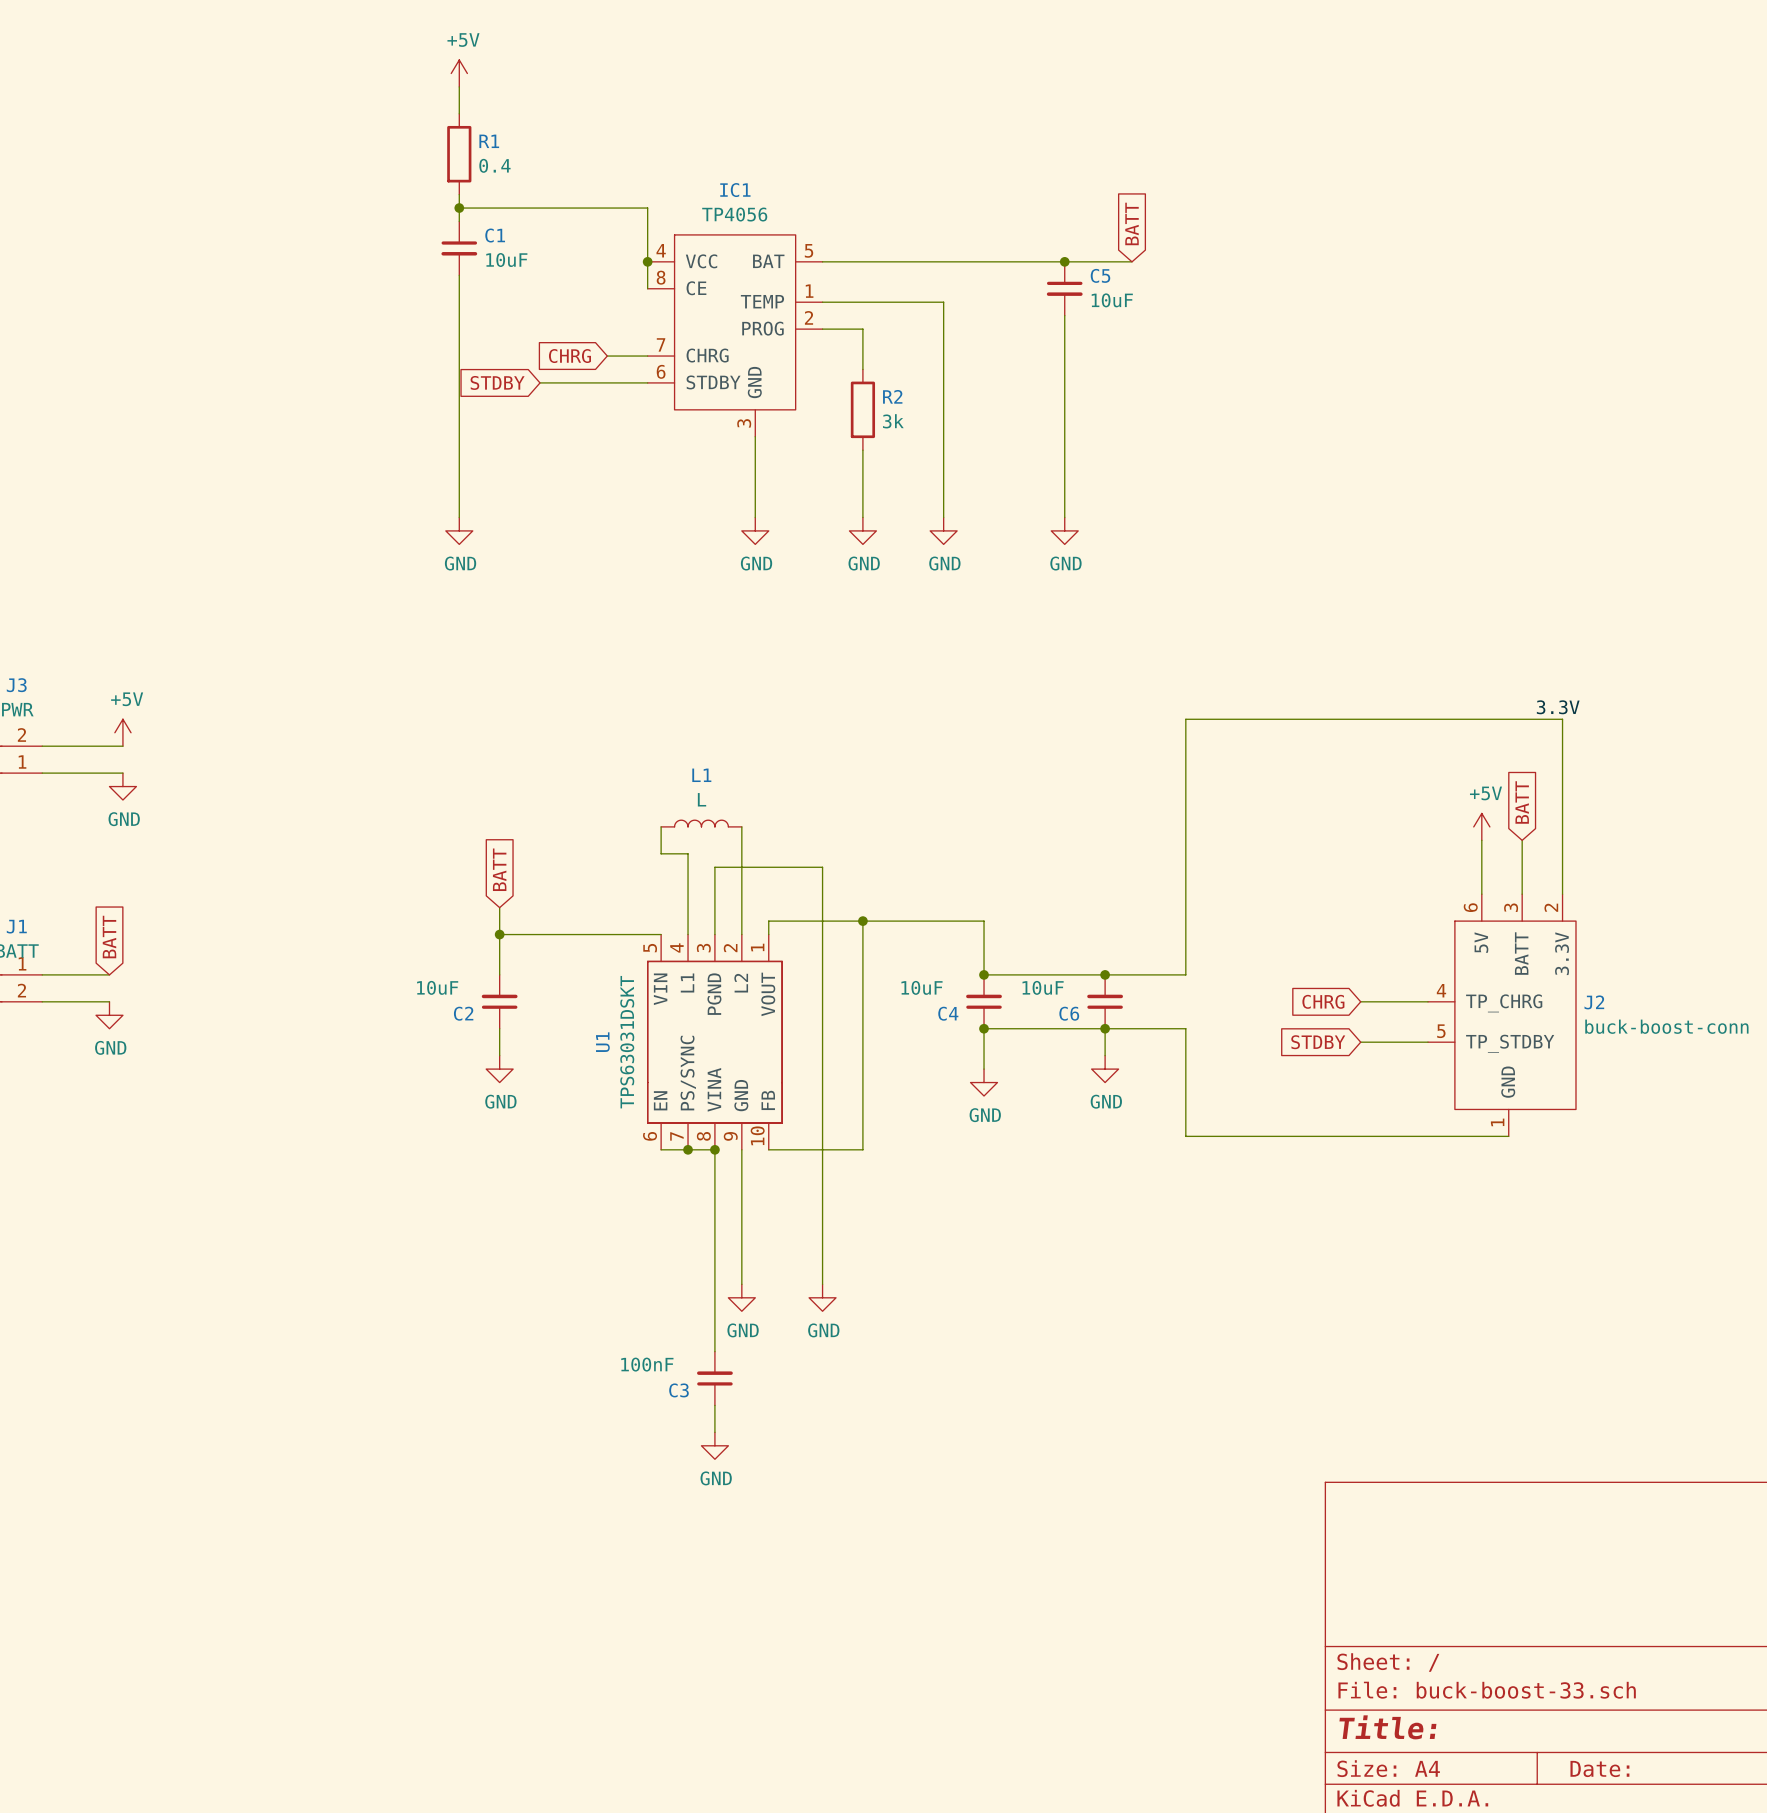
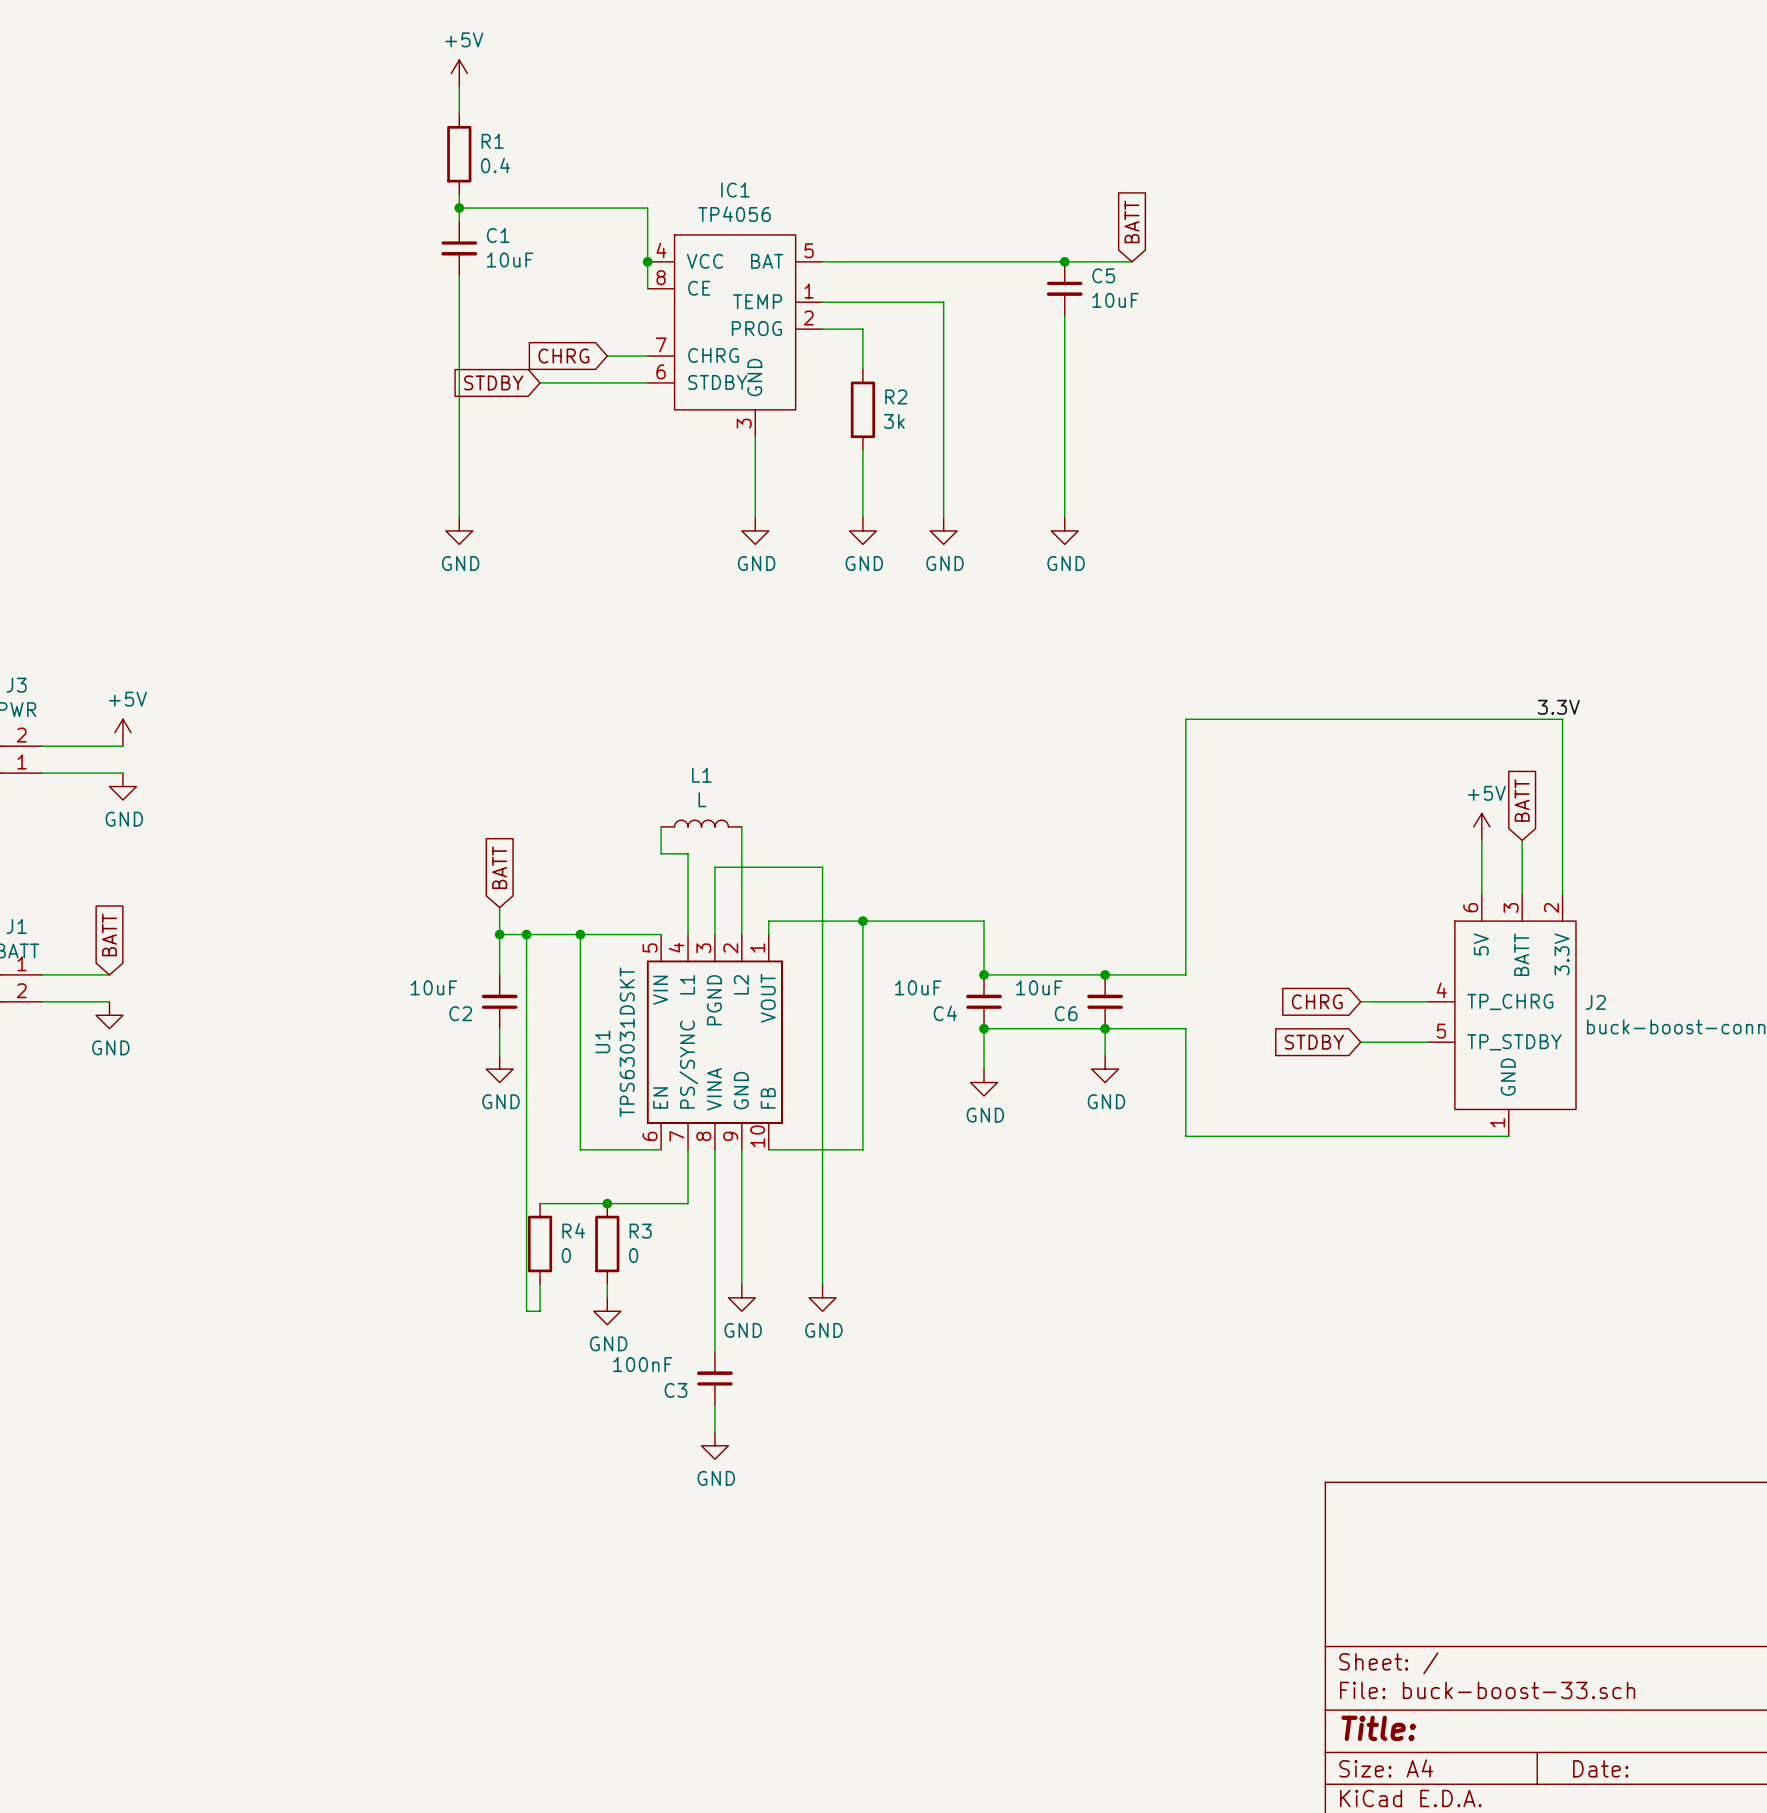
wire: none -> (526, 934) (526, 1311) (540, 1311) (540, 1284)
junction: none -> (526, 934)
junction: none -> (580, 934)
wire: (661, 1149) (714, 1149) -> (661, 1149) (580, 1149) (580, 934)
wire: none -> (688, 1149) (688, 1203) (540, 1203)
junction: (688, 1149) -> none
junction: (714, 1149) -> none
junction: none -> (607, 1203)
R4: none -> 0 (540, 1244)
R3: none -> 0 (607, 1244)
wire: none -> (607, 1284) (607, 1297)
power symbol: none -> GND (607, 1311)

